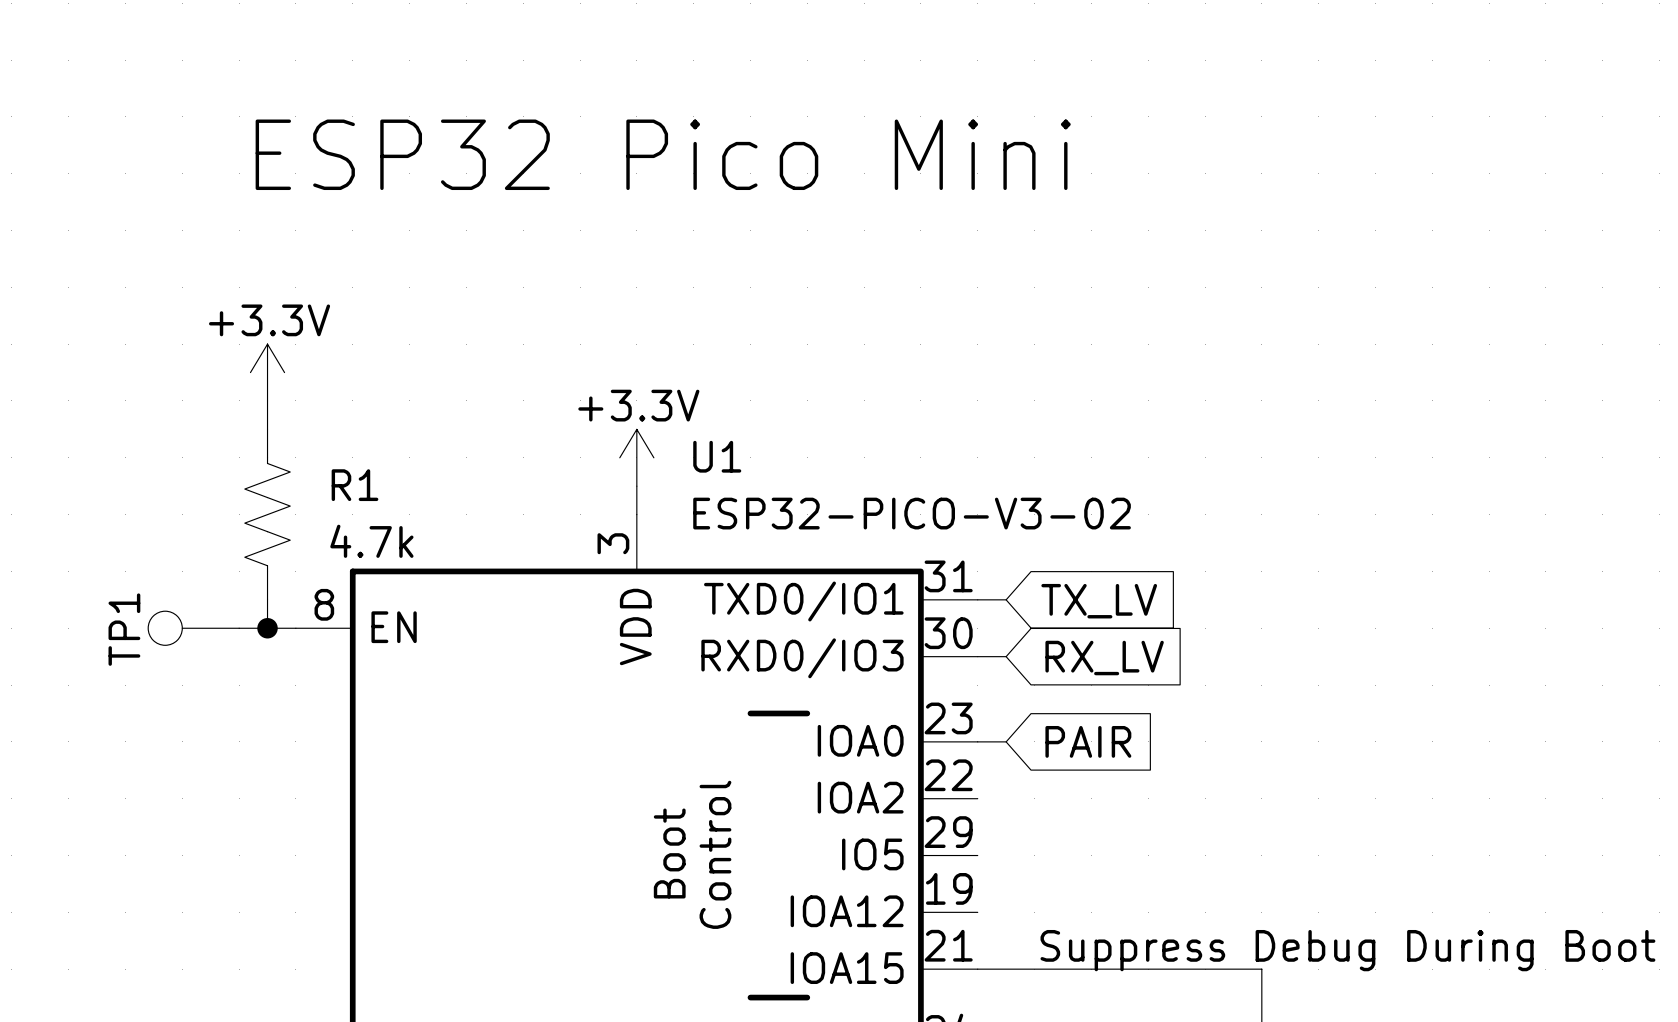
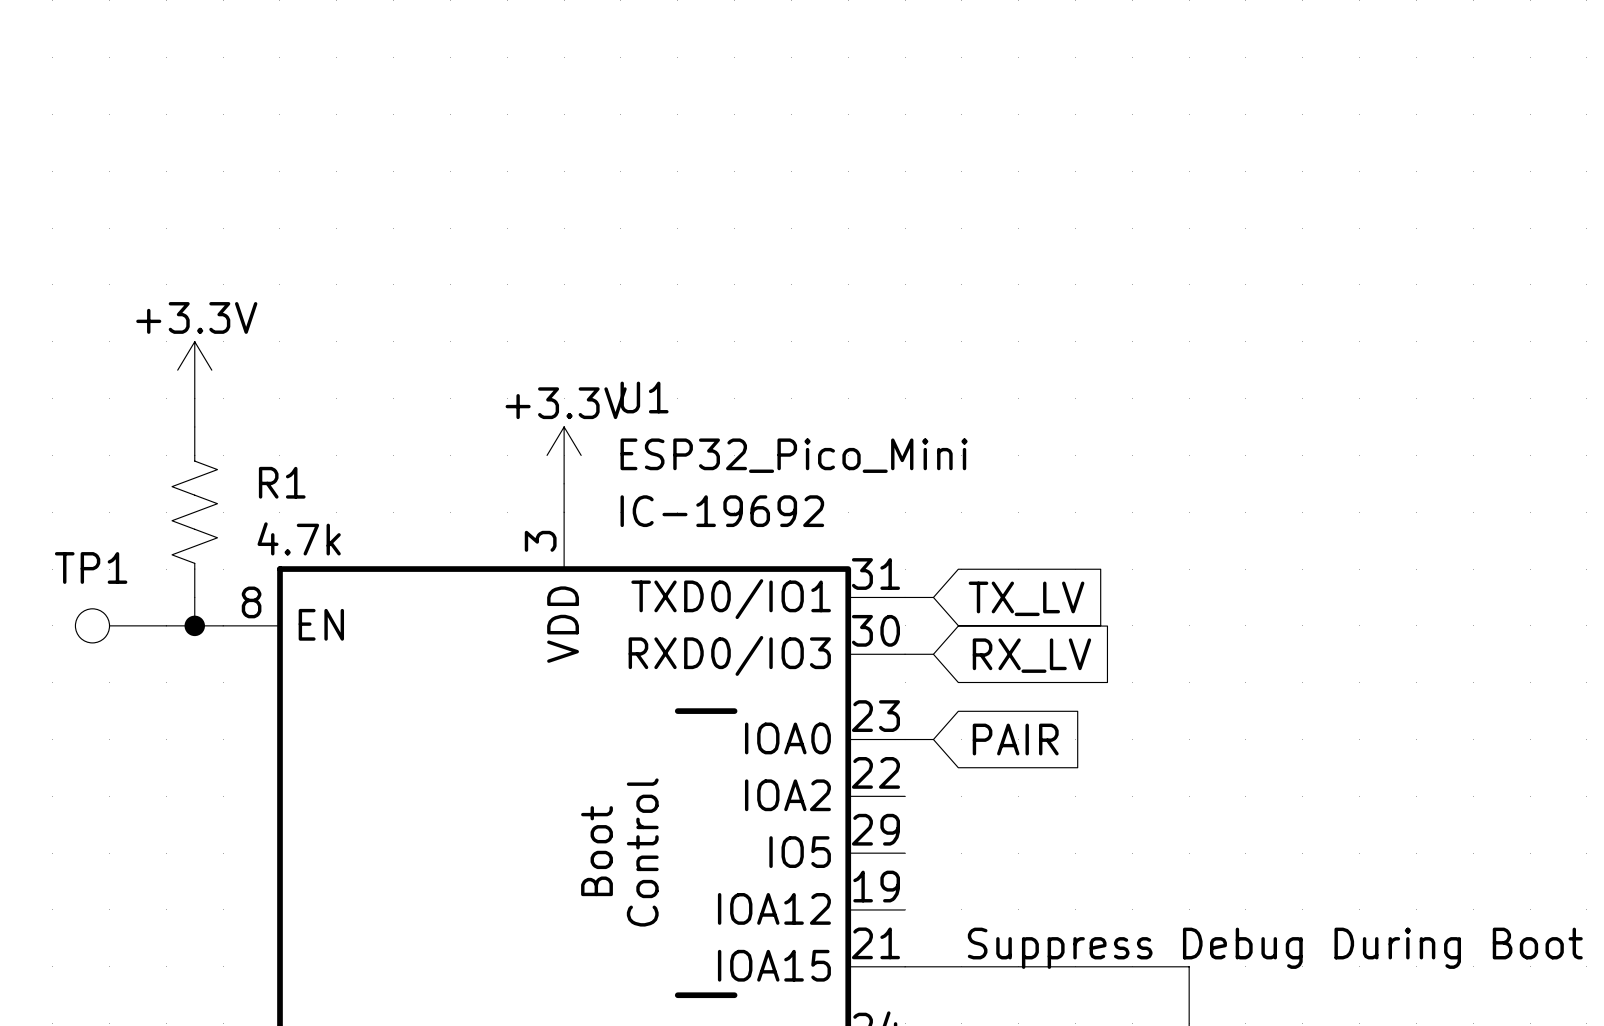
text: ESP32 Pico Mini (663, 154) -> none
U1 name position: U1 (717, 456) -> U1 (644, 397)
U1 text: none -> IC-19692 (722, 511)
U1 value: ESP32-PICO-V3-02 (912, 513) -> ESP32_Pico_Mini (794, 455)
TP1 name rotation: 0° (124, 629) -> 90° clockwise (91, 567)

